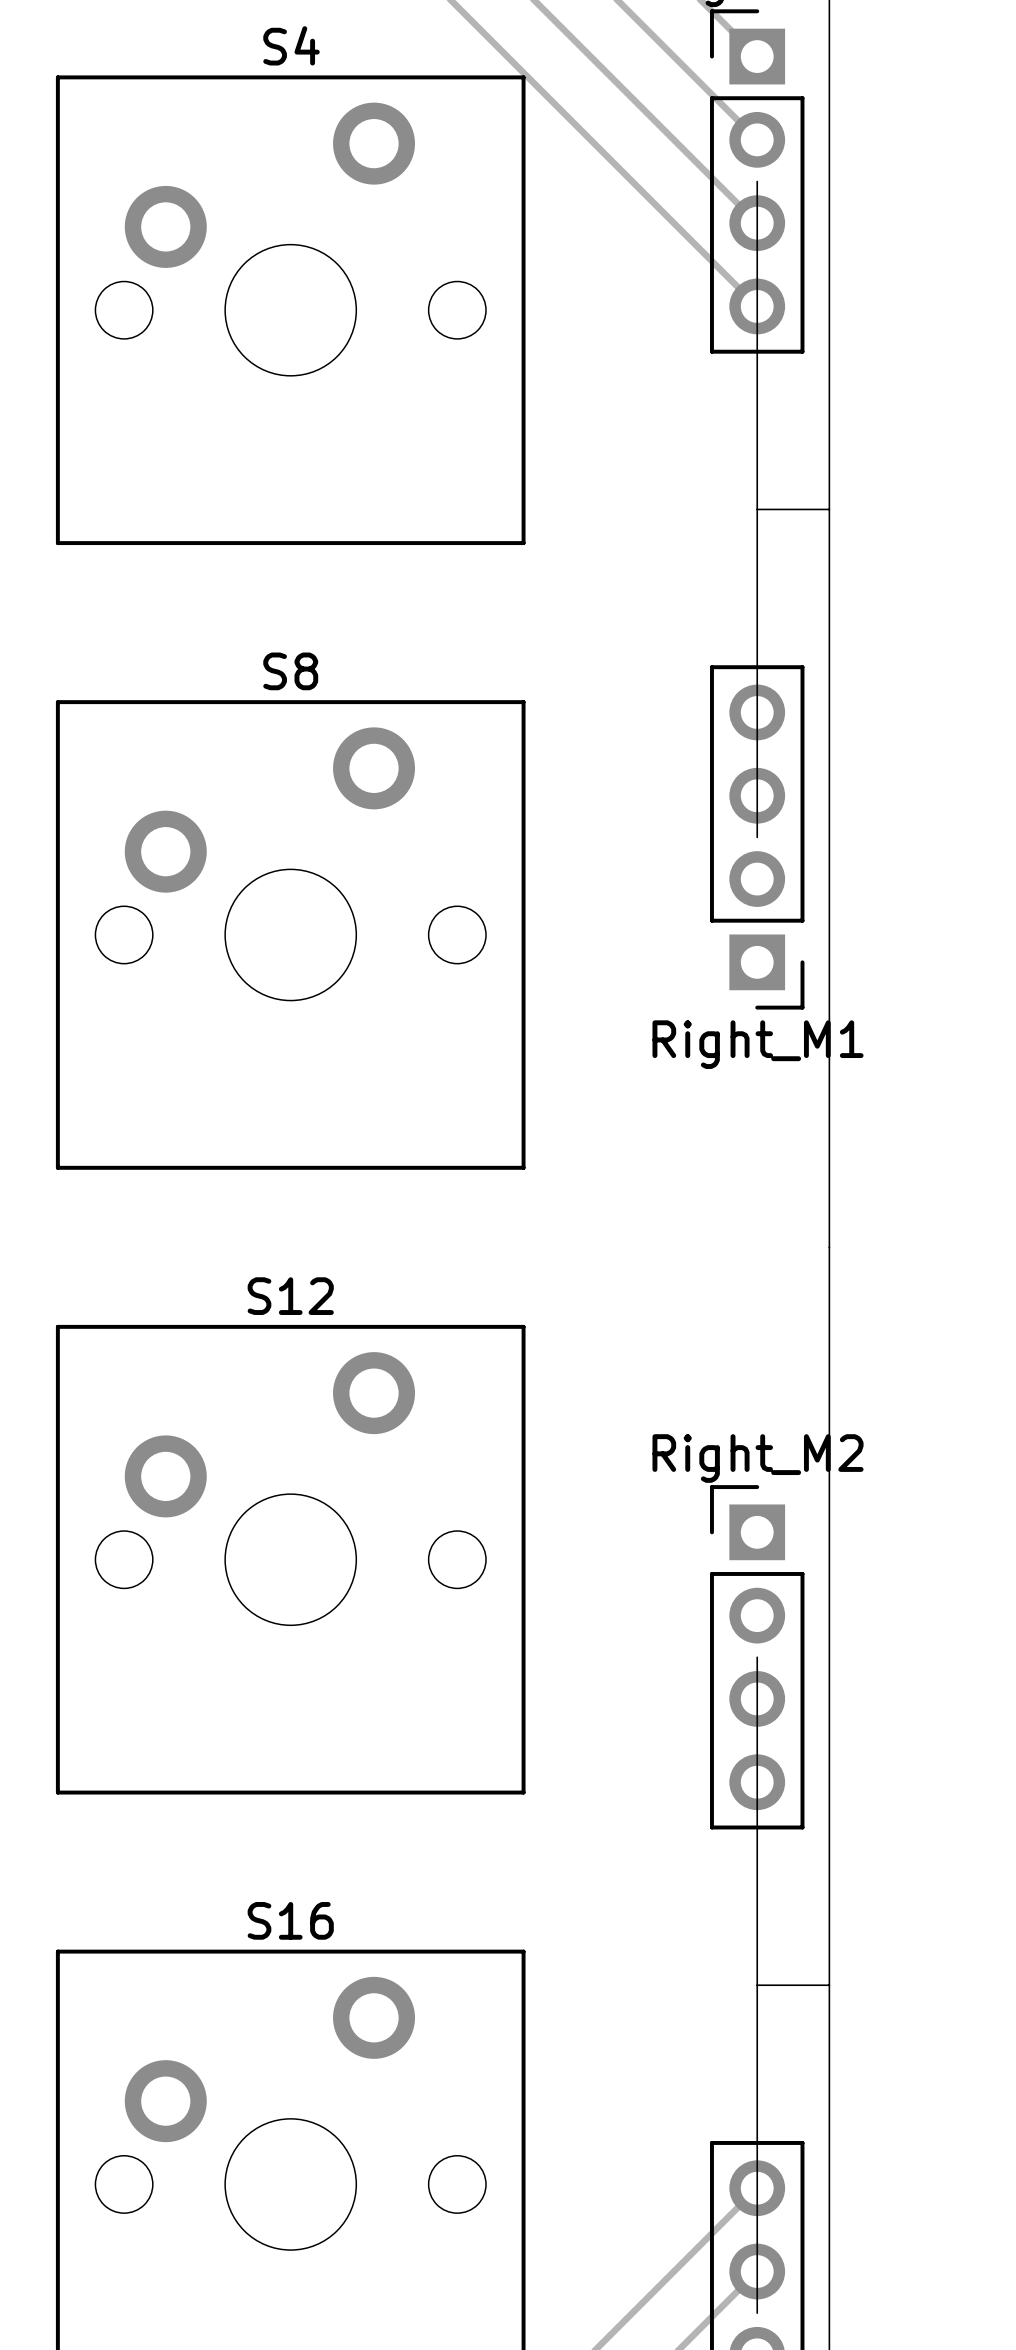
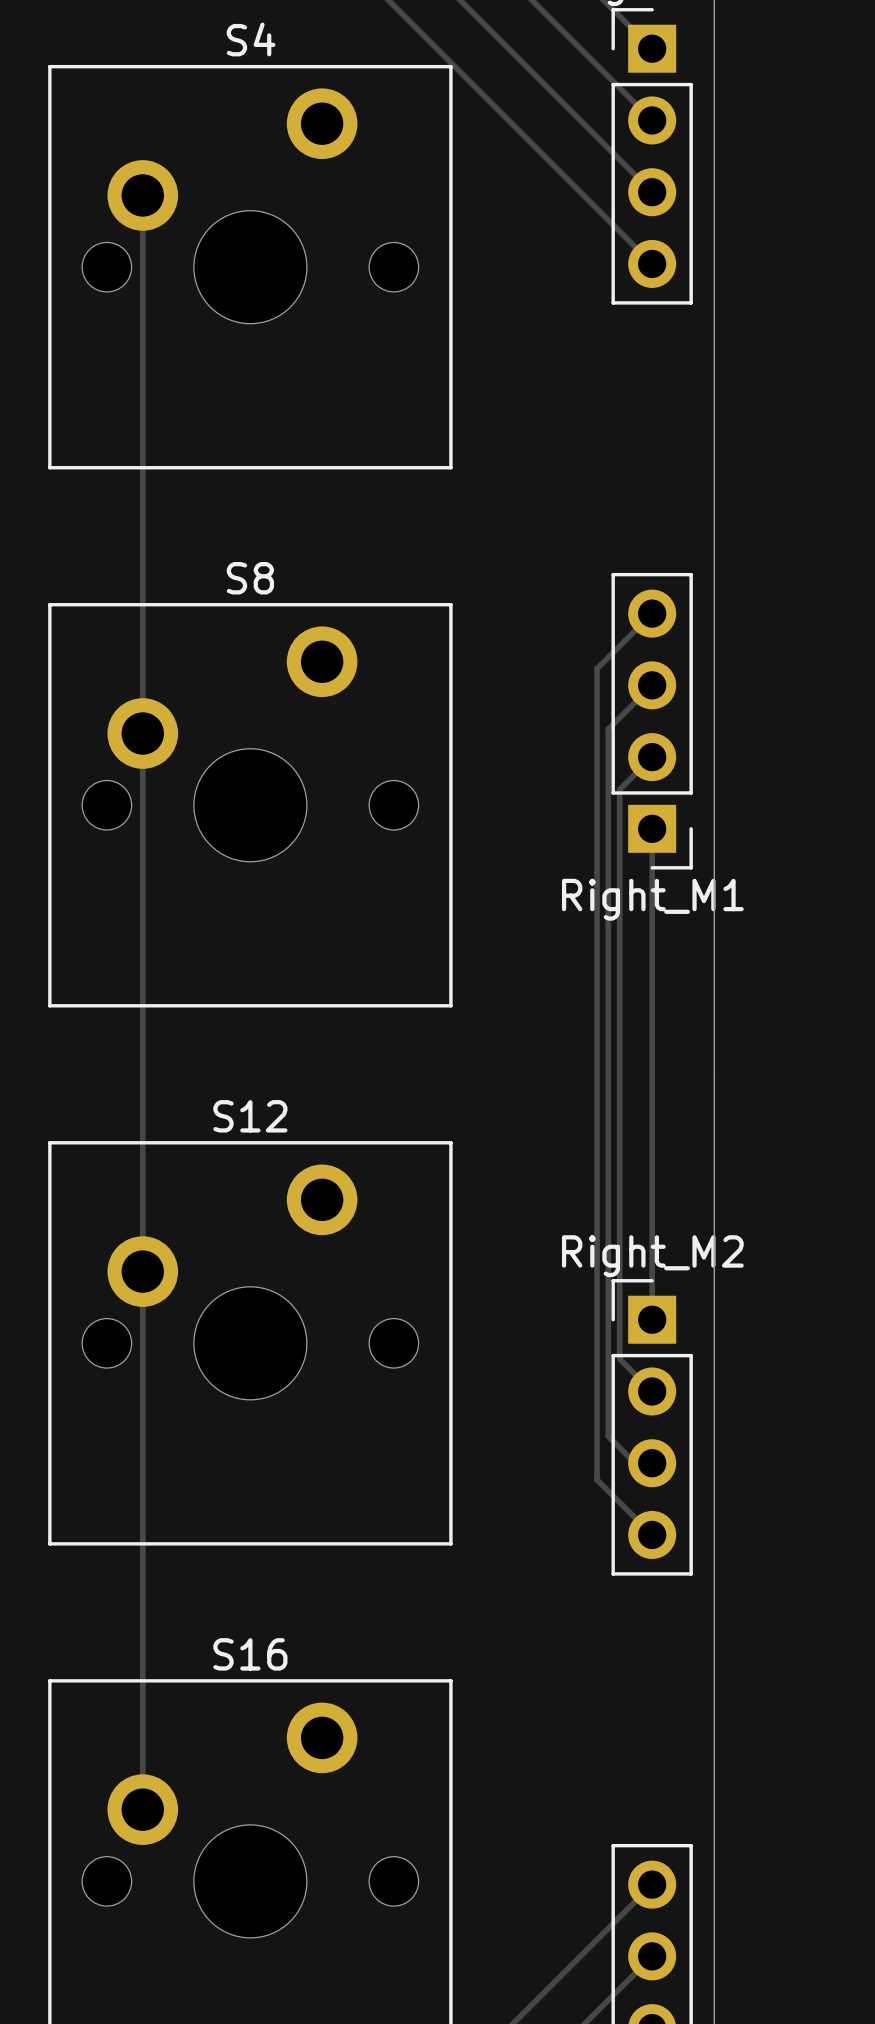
board edge: (757, 181) (757, 837) -> none
track: none -> (142, 195) (142, 1809)
board edge: (757, 509) (829, 509) -> none
track: none -> (652, 613) (597, 668) (597, 1479) (652, 1534)
track: none -> (652, 685) (608, 729) (608, 1436) (635, 1463)
track: none -> (652, 757) (619, 789) (619, 1358) (652, 1391)
track: none -> (652, 828) (652, 1319)
board edge: (757, 1657) (757, 2313) -> none
board edge: (757, 1985) (829, 1985) -> none

